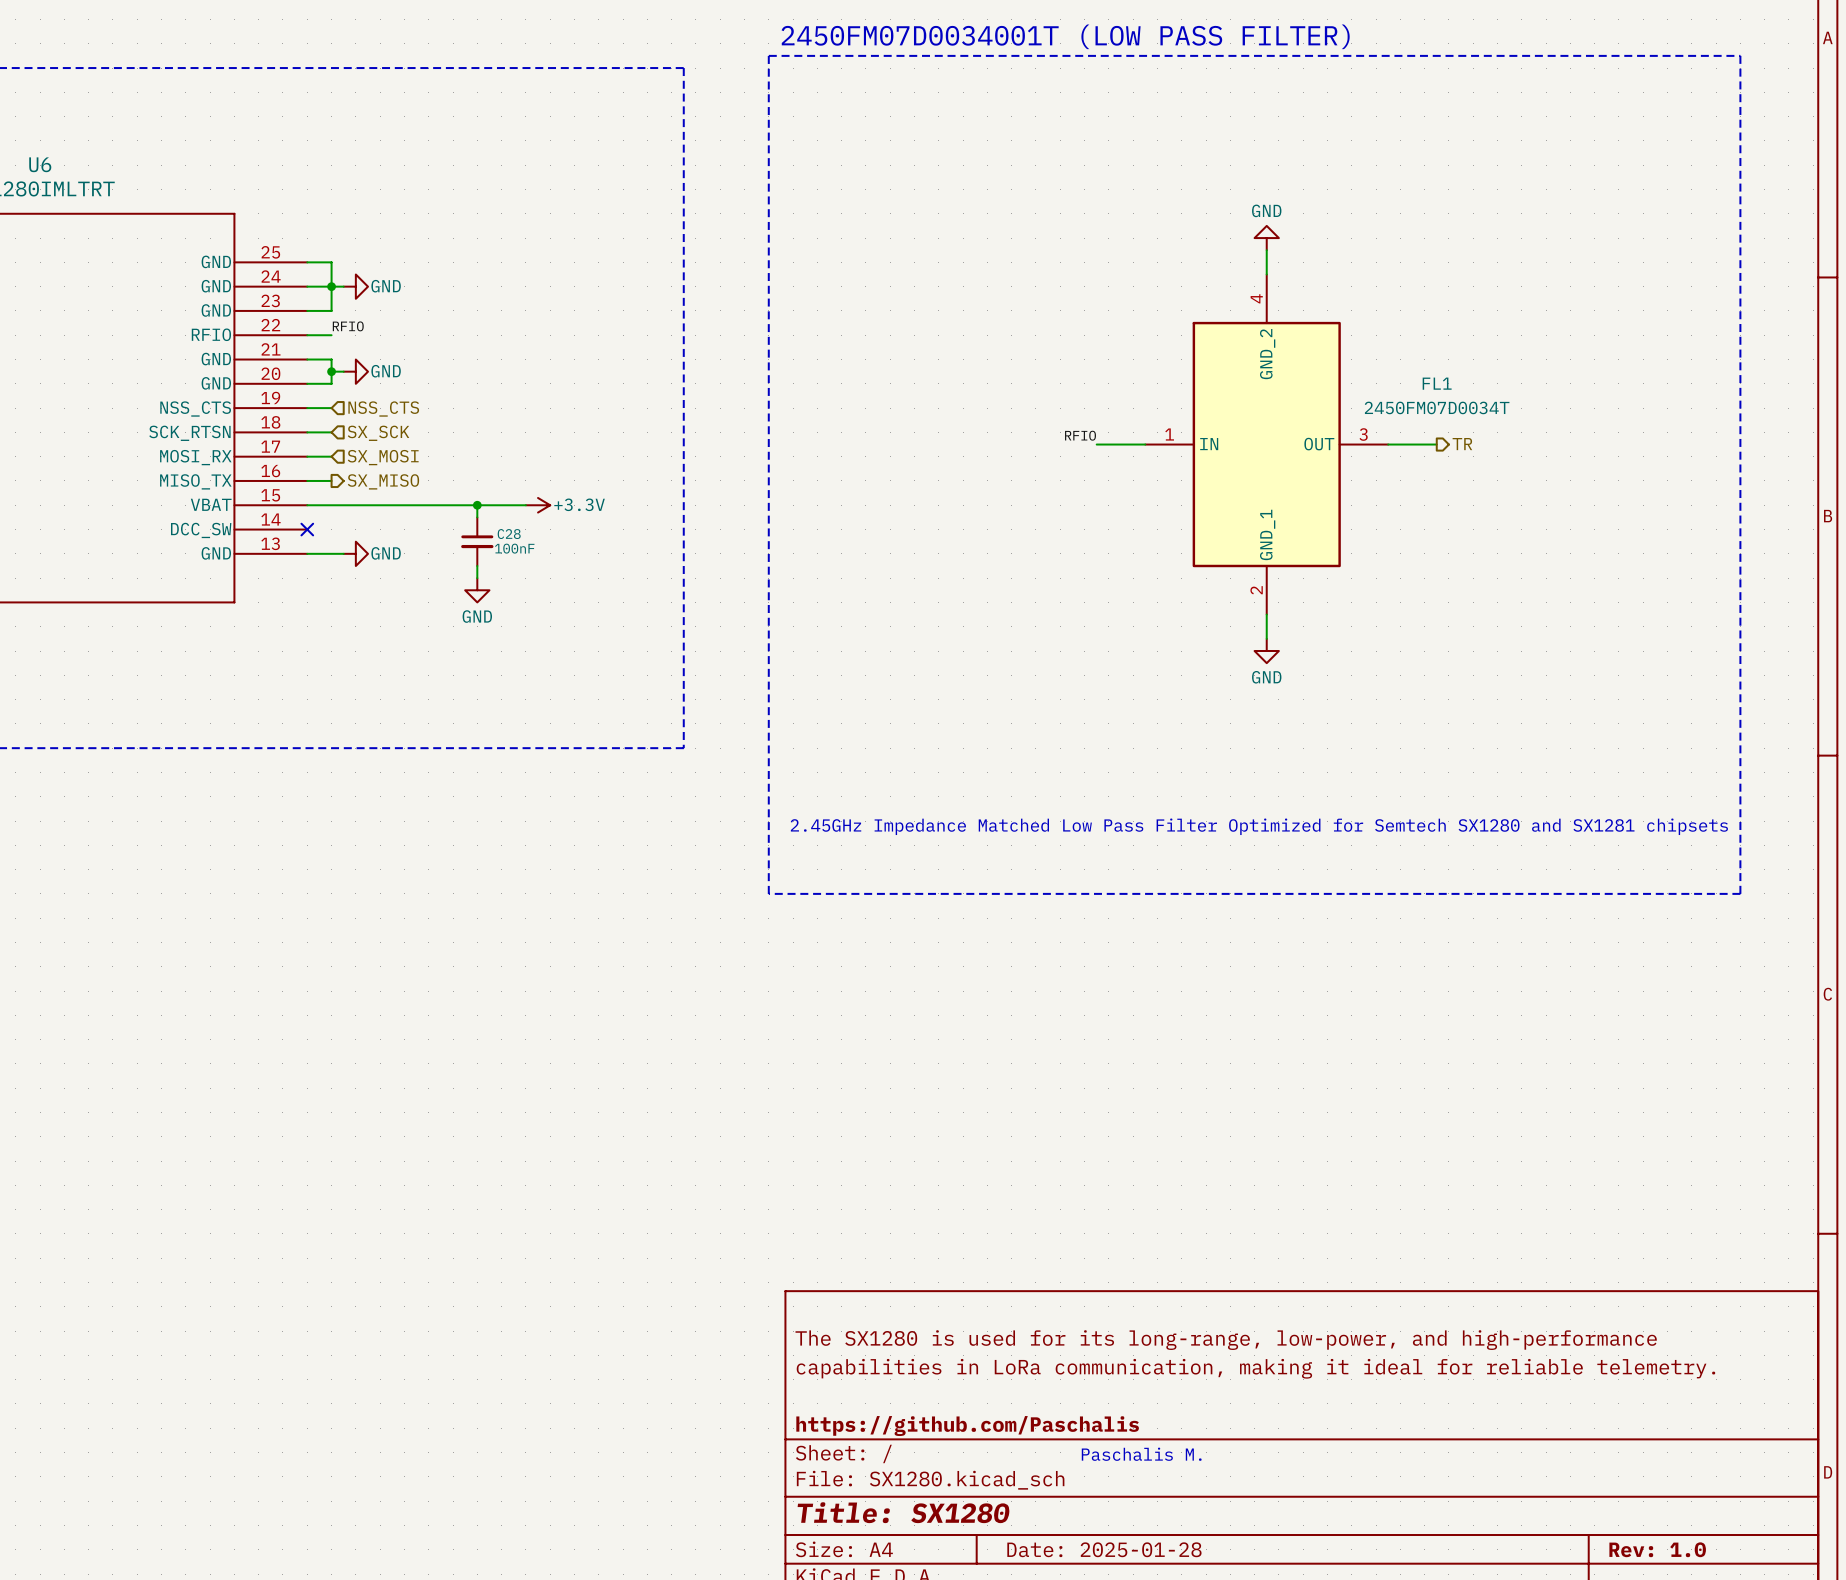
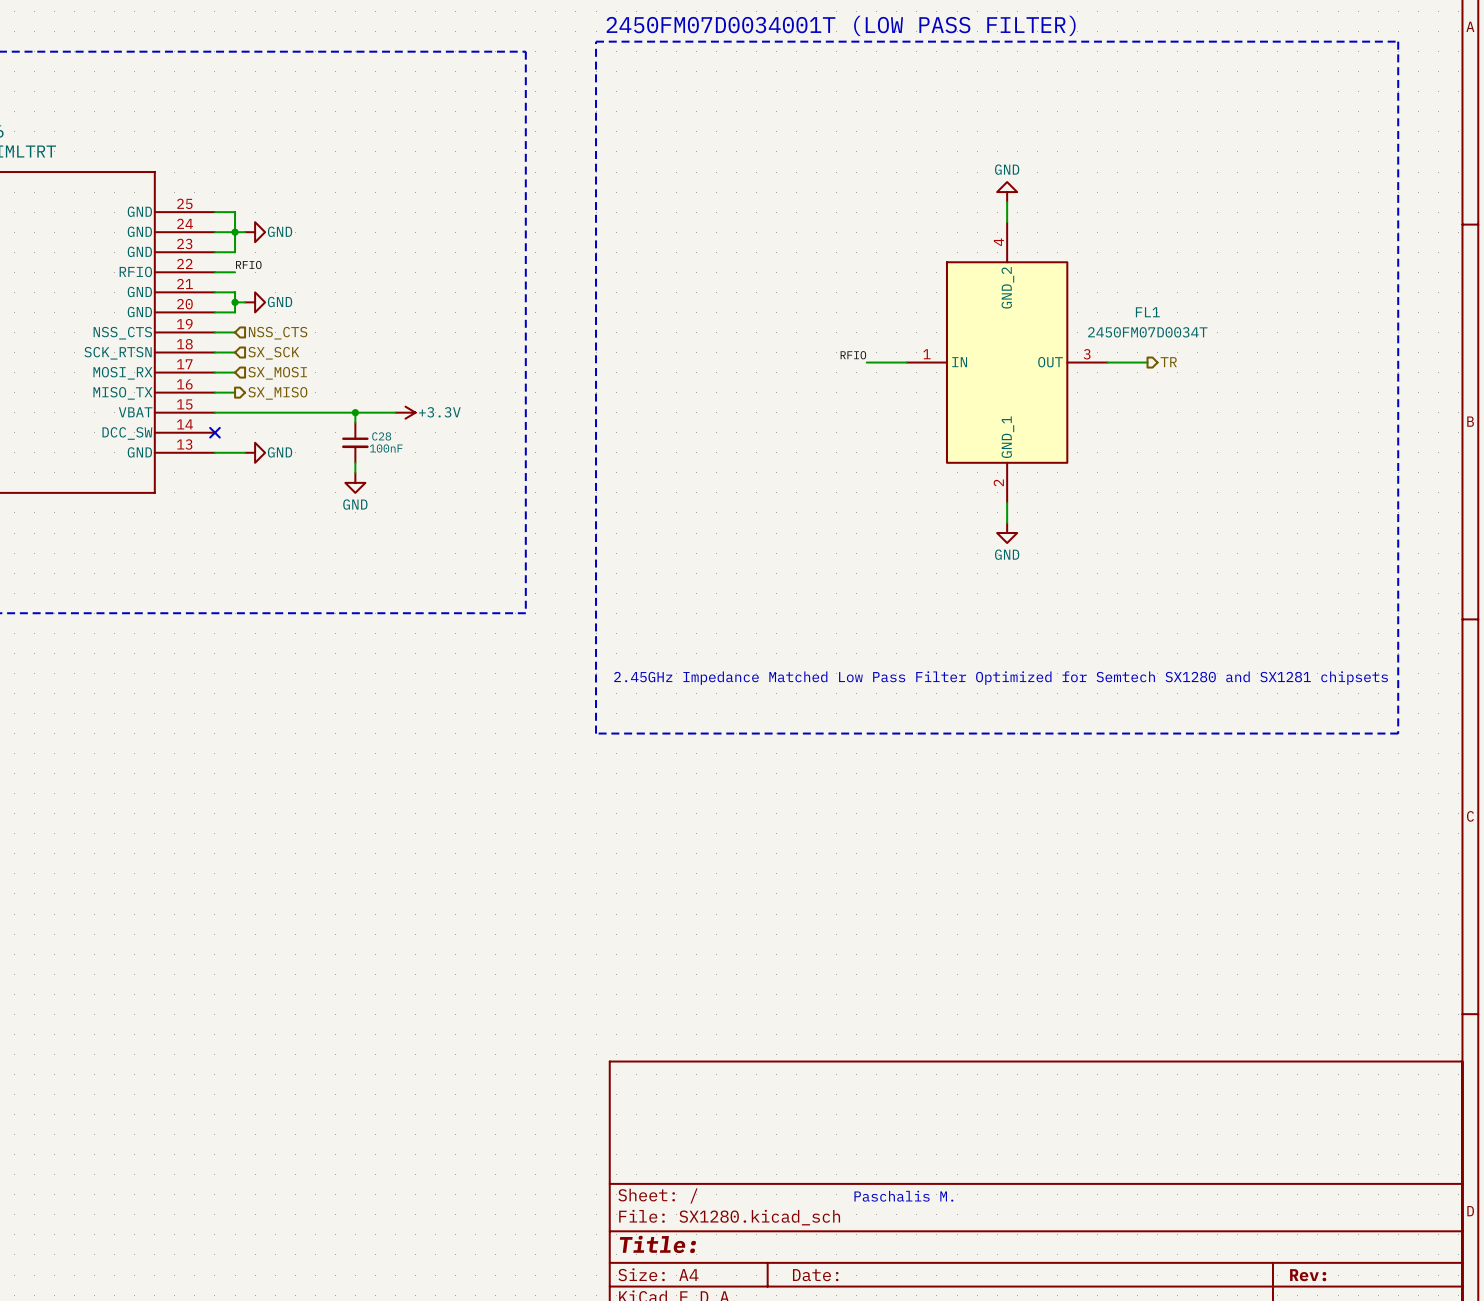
title block: The SX1280 is used for its long-range, low-power, and high-performance (1226, 1340) -> none
title block: capabilities in LoRa communication, making it ideal for reliable telemetry. (1255, 1368) -> none
title block: https://github.com/Paschalis (967, 1426) -> none
title block: Title: SX1280 (903, 1512) -> Title: (657, 1244)
title block: Date: 2025-01-28 (1104, 1549) -> Date: (815, 1275)
title block: Rev: 1.0 (1657, 1549) -> Rev: (1308, 1275)

